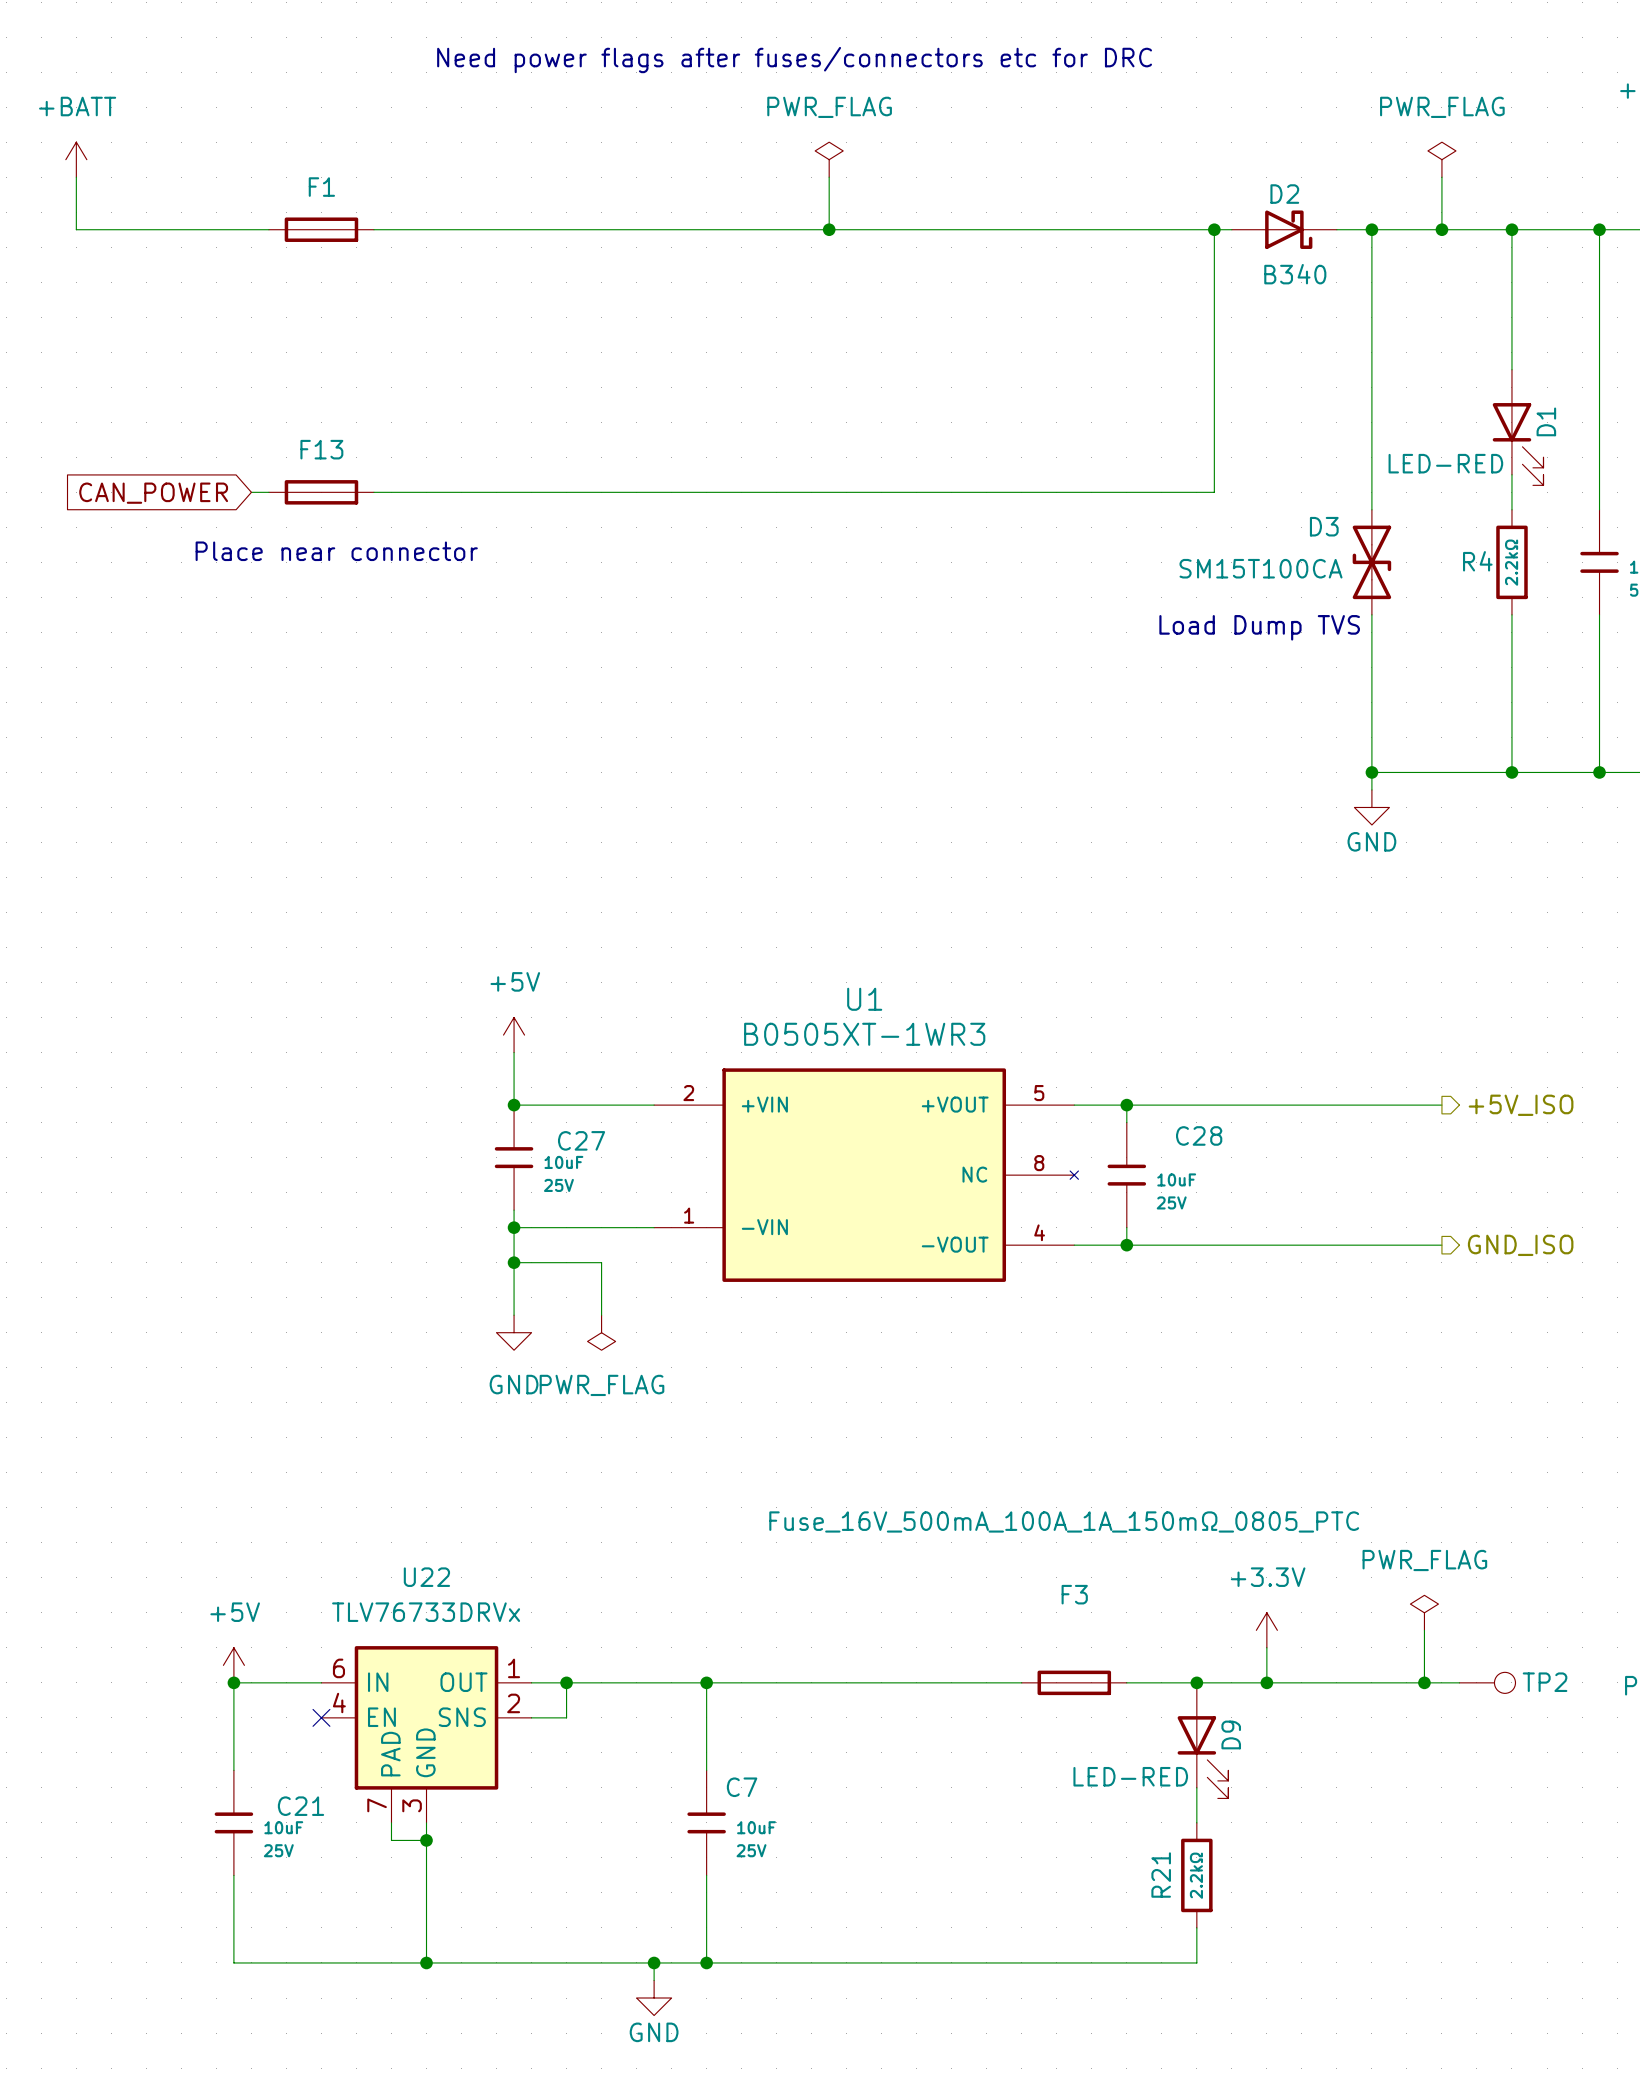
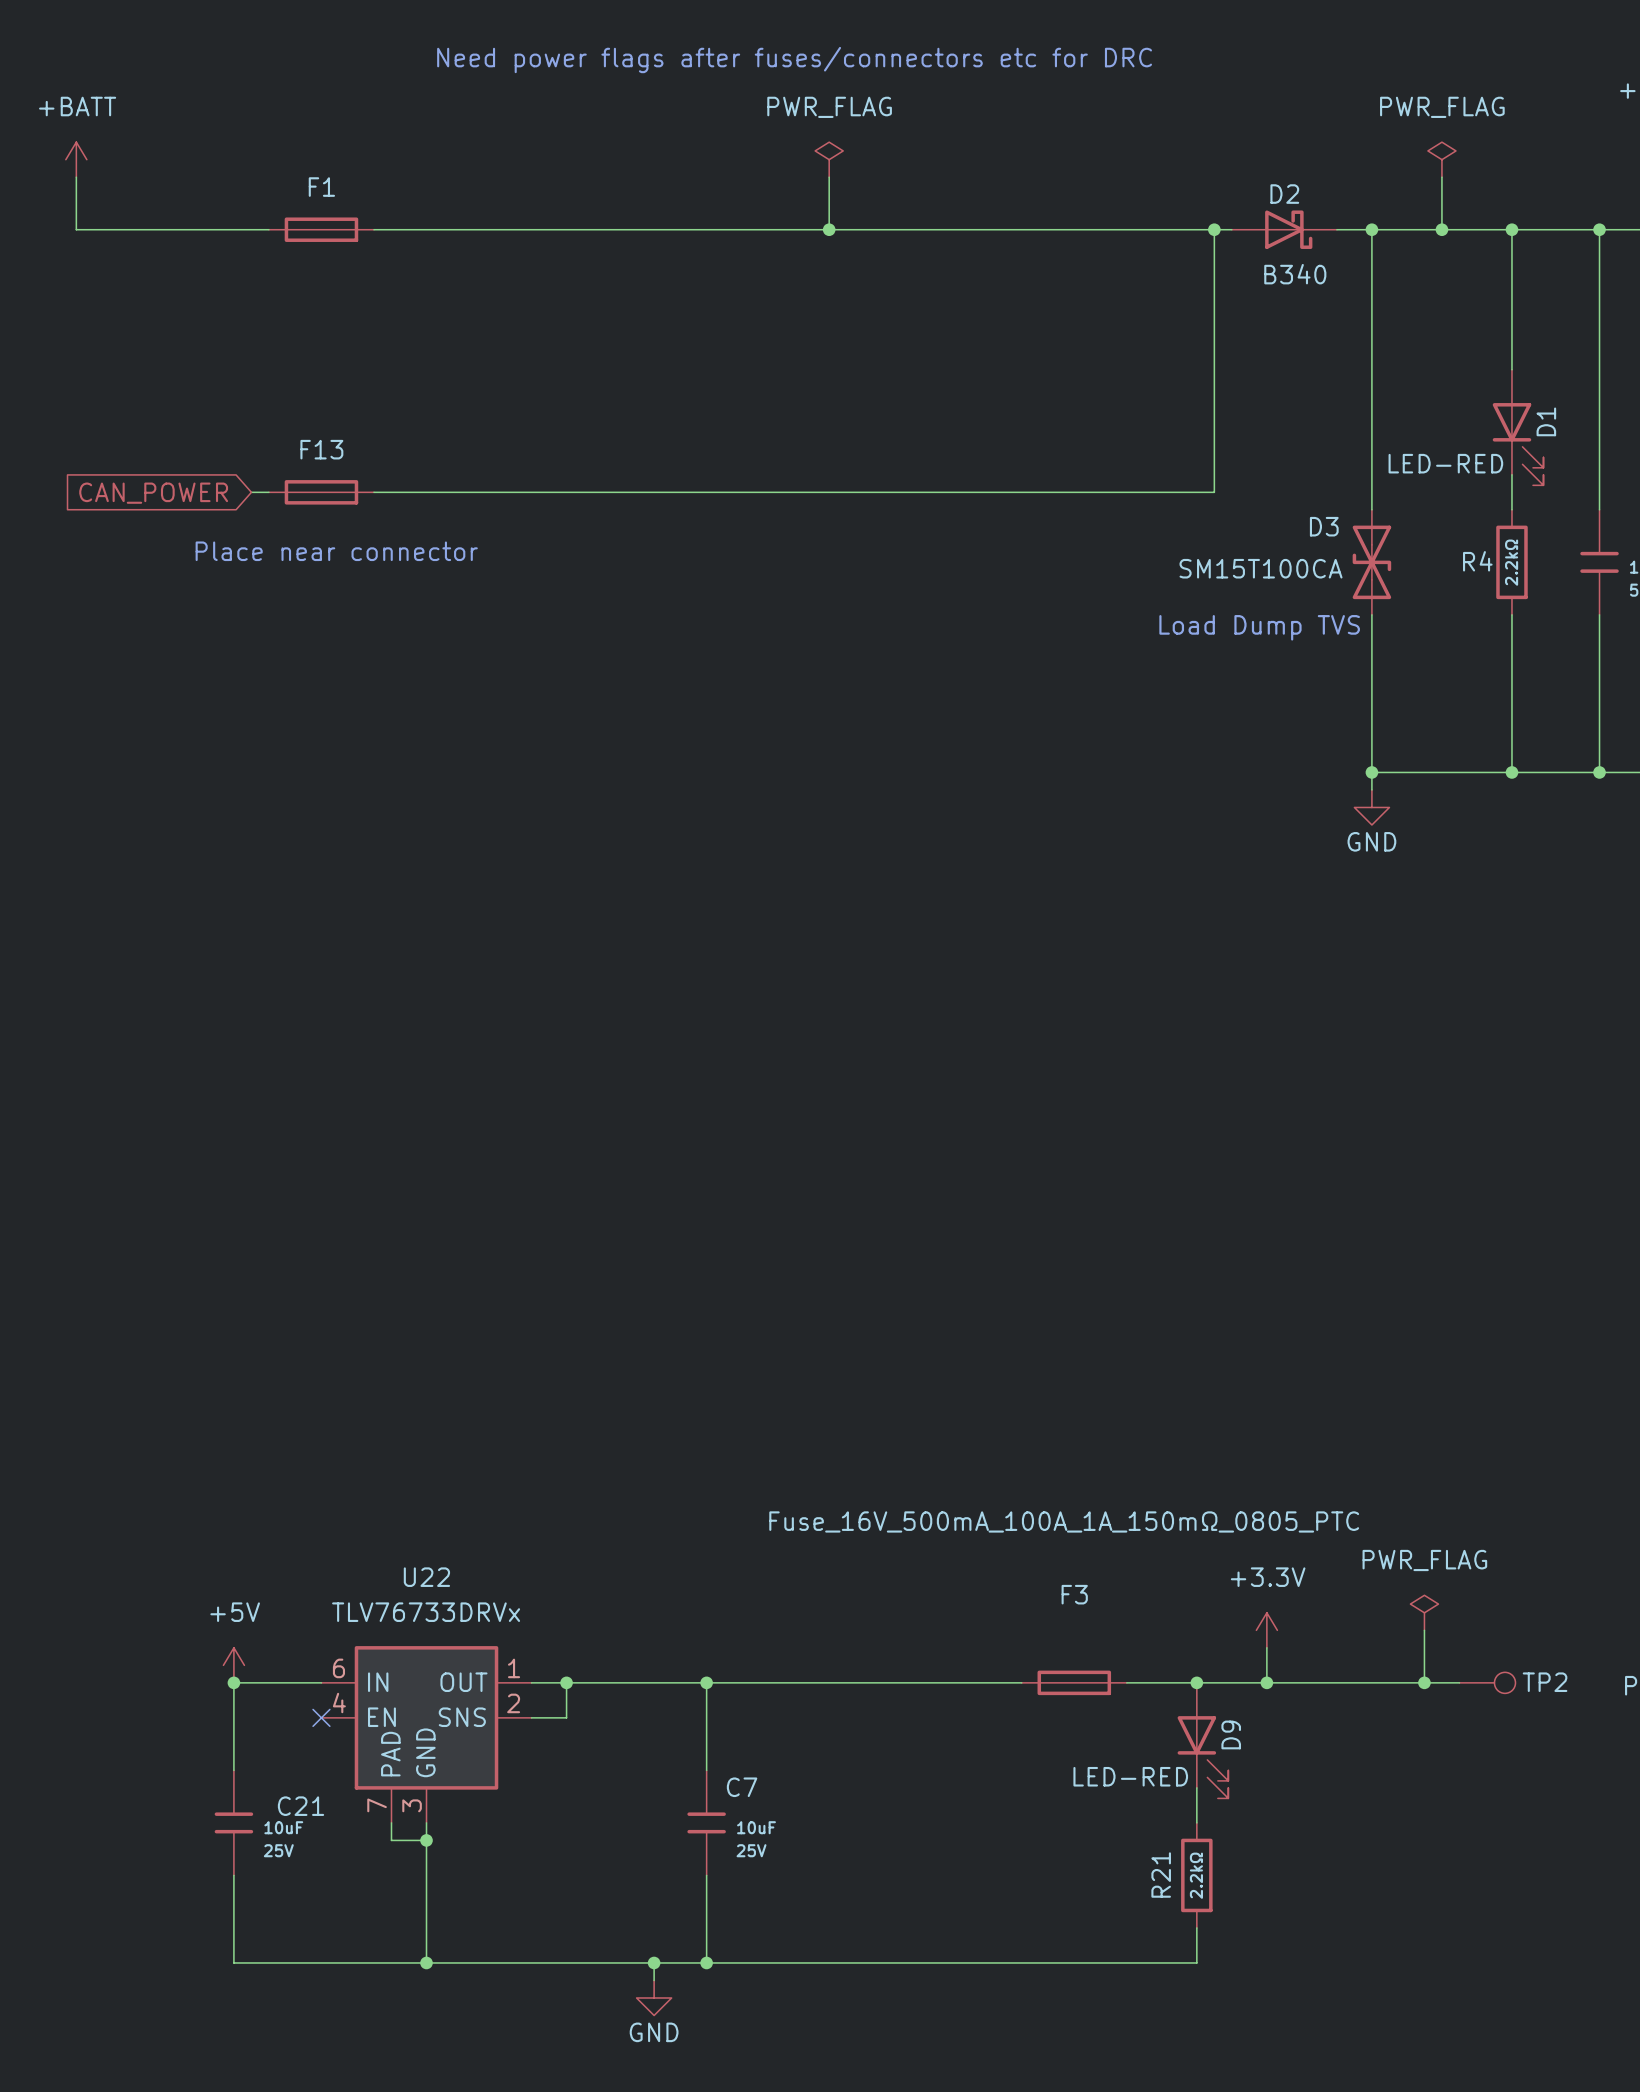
power symbol: +5V (514, 1035) -> none
wire: (514, 1052) (514, 1105) (654, 1105) -> none
junction: (514, 1105) -> none
wire: (1074, 1105) (1441, 1105) -> none
wire: (1126, 1105) (1126, 1122) -> none
junction: (1126, 1105) -> none
hierarchical label: +5V_ISO (1521, 1105) -> none
C27: 10uF (514, 1157) -> none
U1: B0505XT-1WR3 (866, 1175) -> none
C28: 10uF (1126, 1175) -> none
wire: (514, 1210) (514, 1315) -> none
wire: (514, 1227) (654, 1227) -> none
junction: (514, 1227) -> none
wire: (1126, 1227) (1126, 1245) -> none
wire: (1074, 1245) (1441, 1245) -> none
junction: (1126, 1245) -> none
hierarchical label: GND_ISO (1520, 1245) -> none
wire: (514, 1262) (601, 1262) (601, 1315) -> none
junction: (514, 1262) -> none
power symbol: GND (514, 1332) -> none
power symbol: PWR_FLAG (601, 1332) -> none

